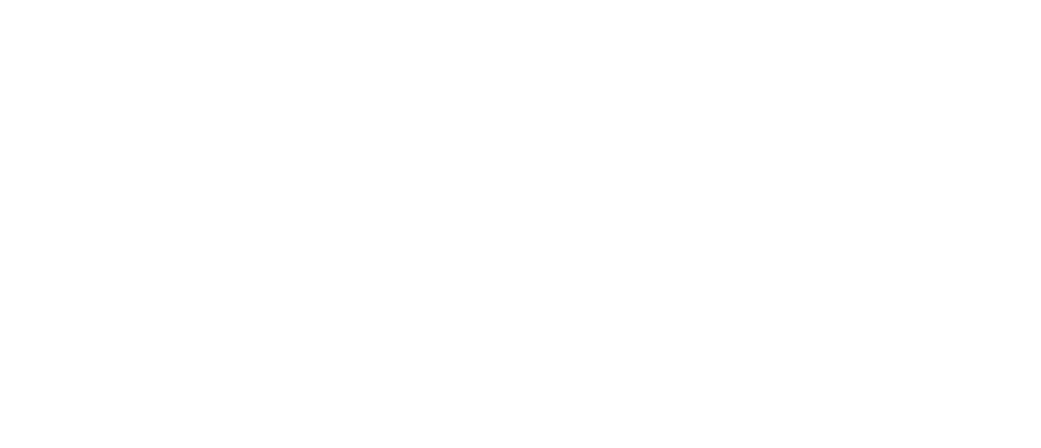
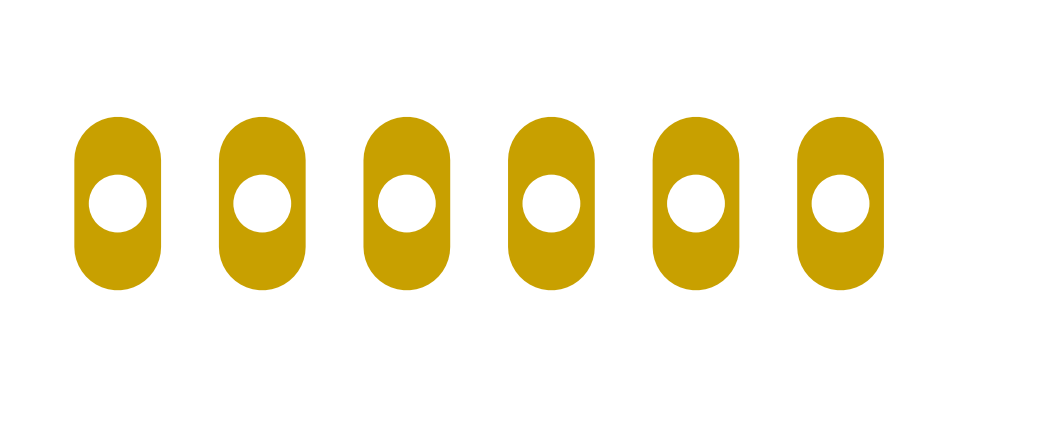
part: none -> (479, 203)

